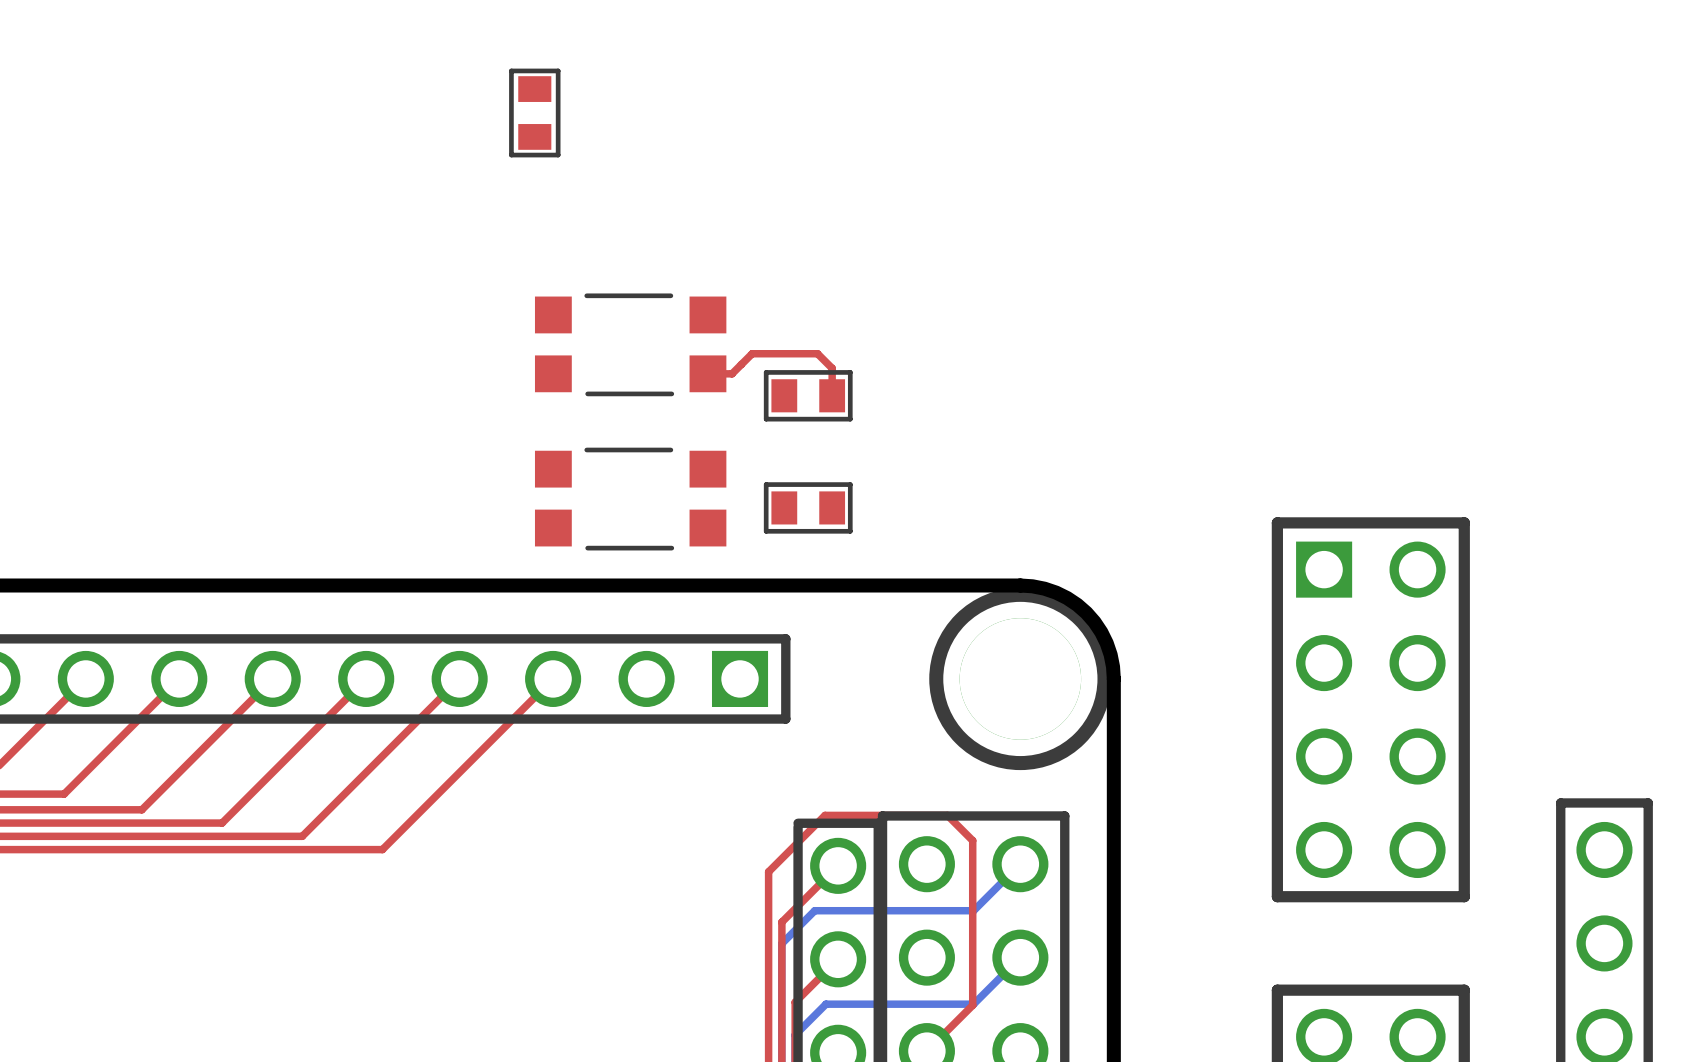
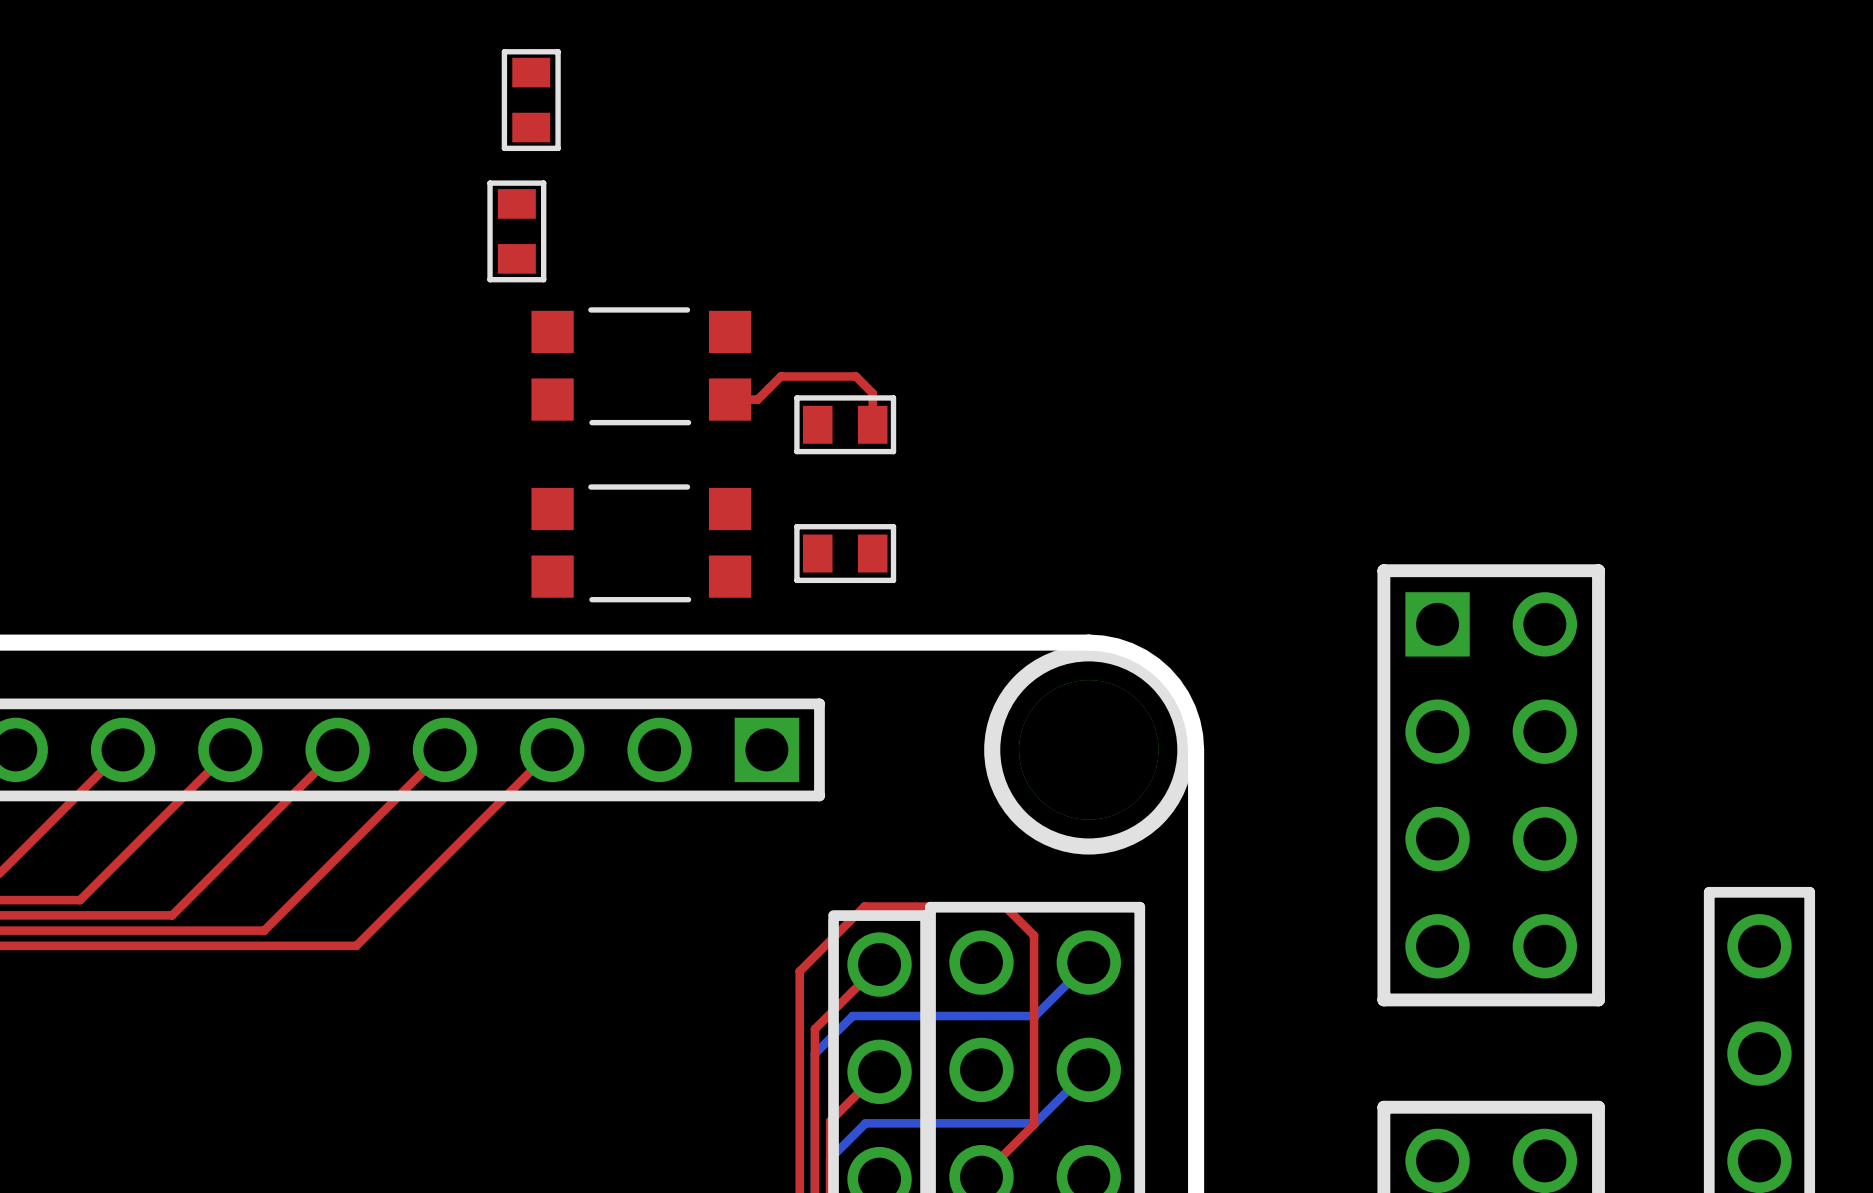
part: none -> (516, 231)

